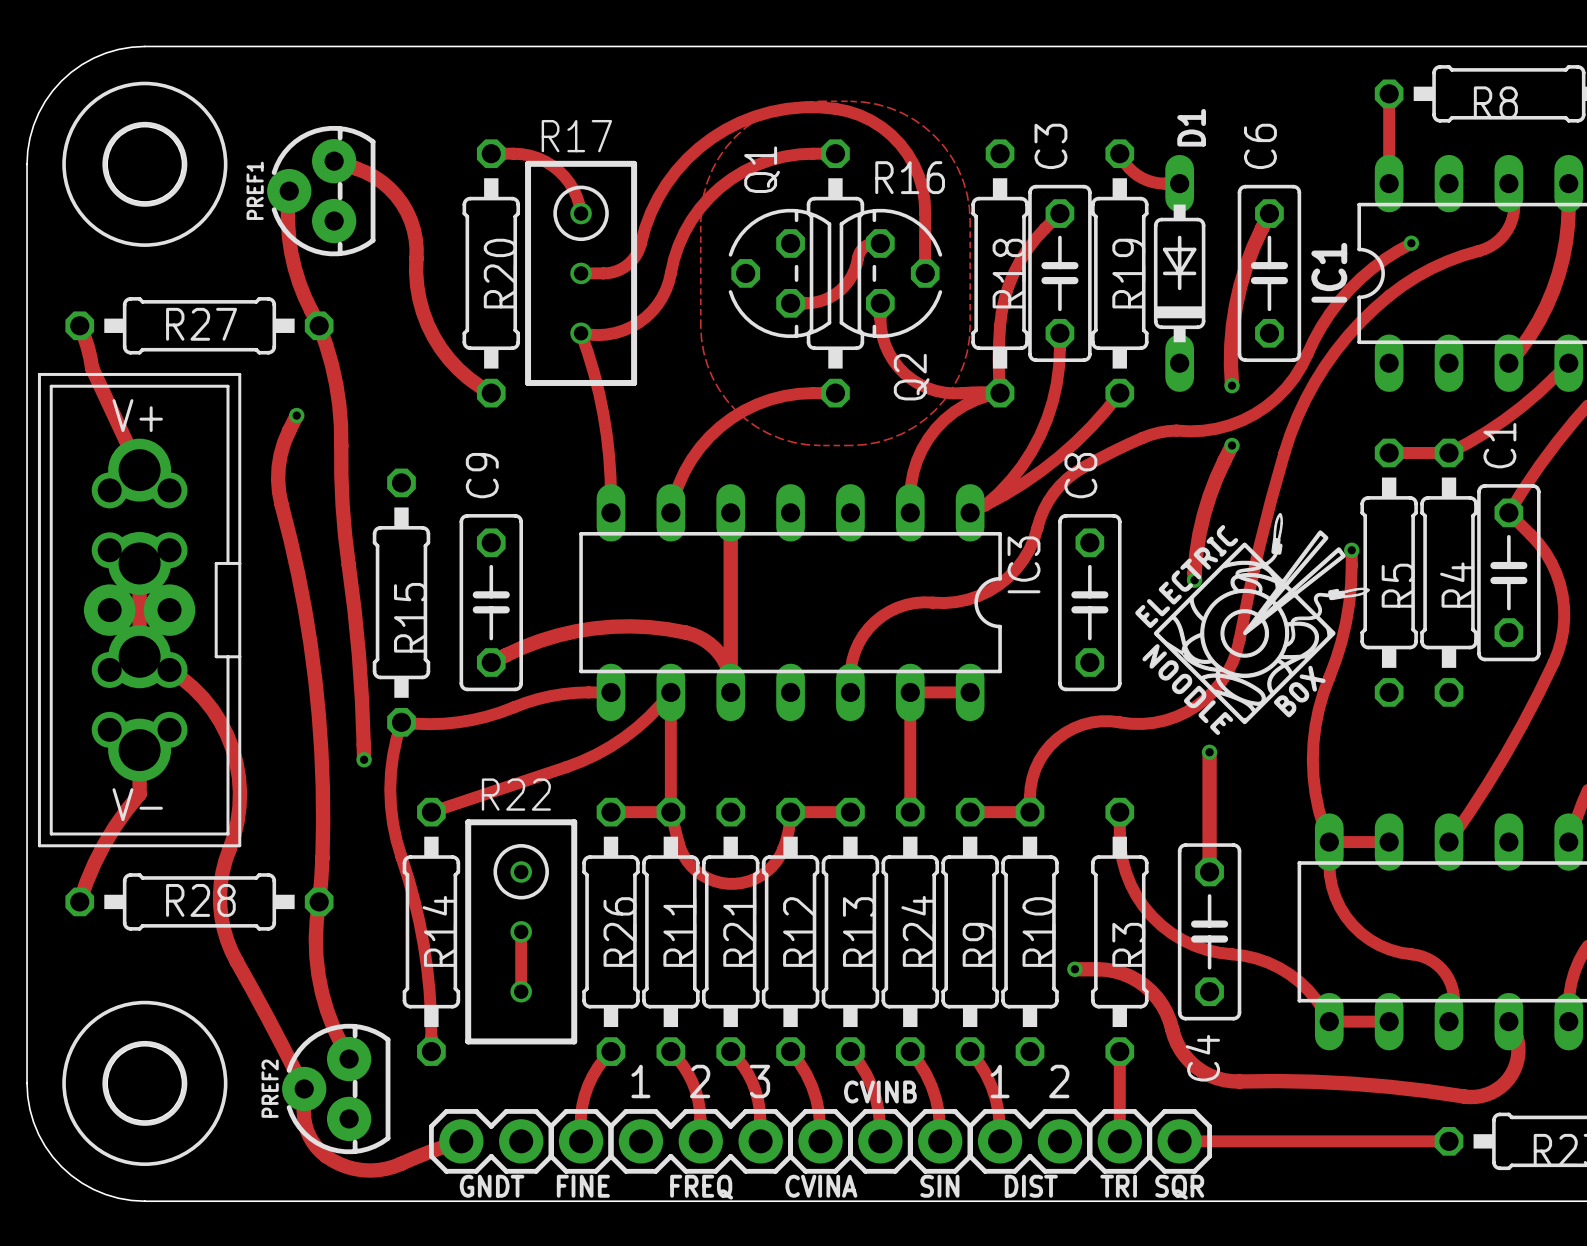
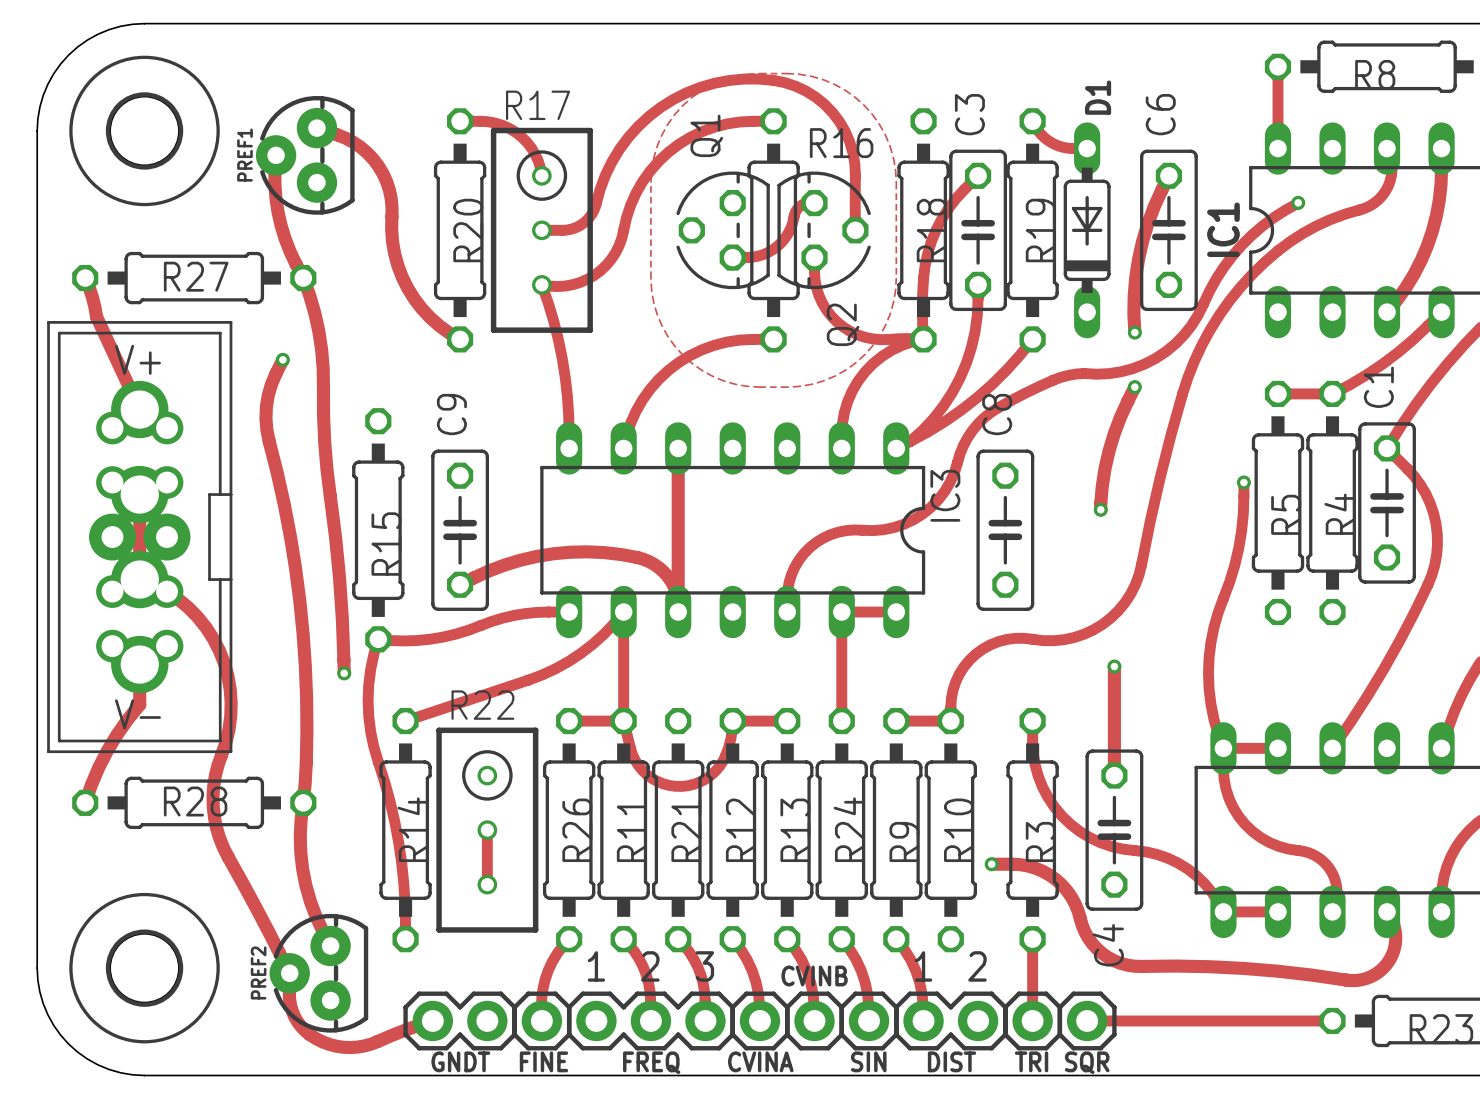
drawing: [1135, 512, 1371, 735] -> none

